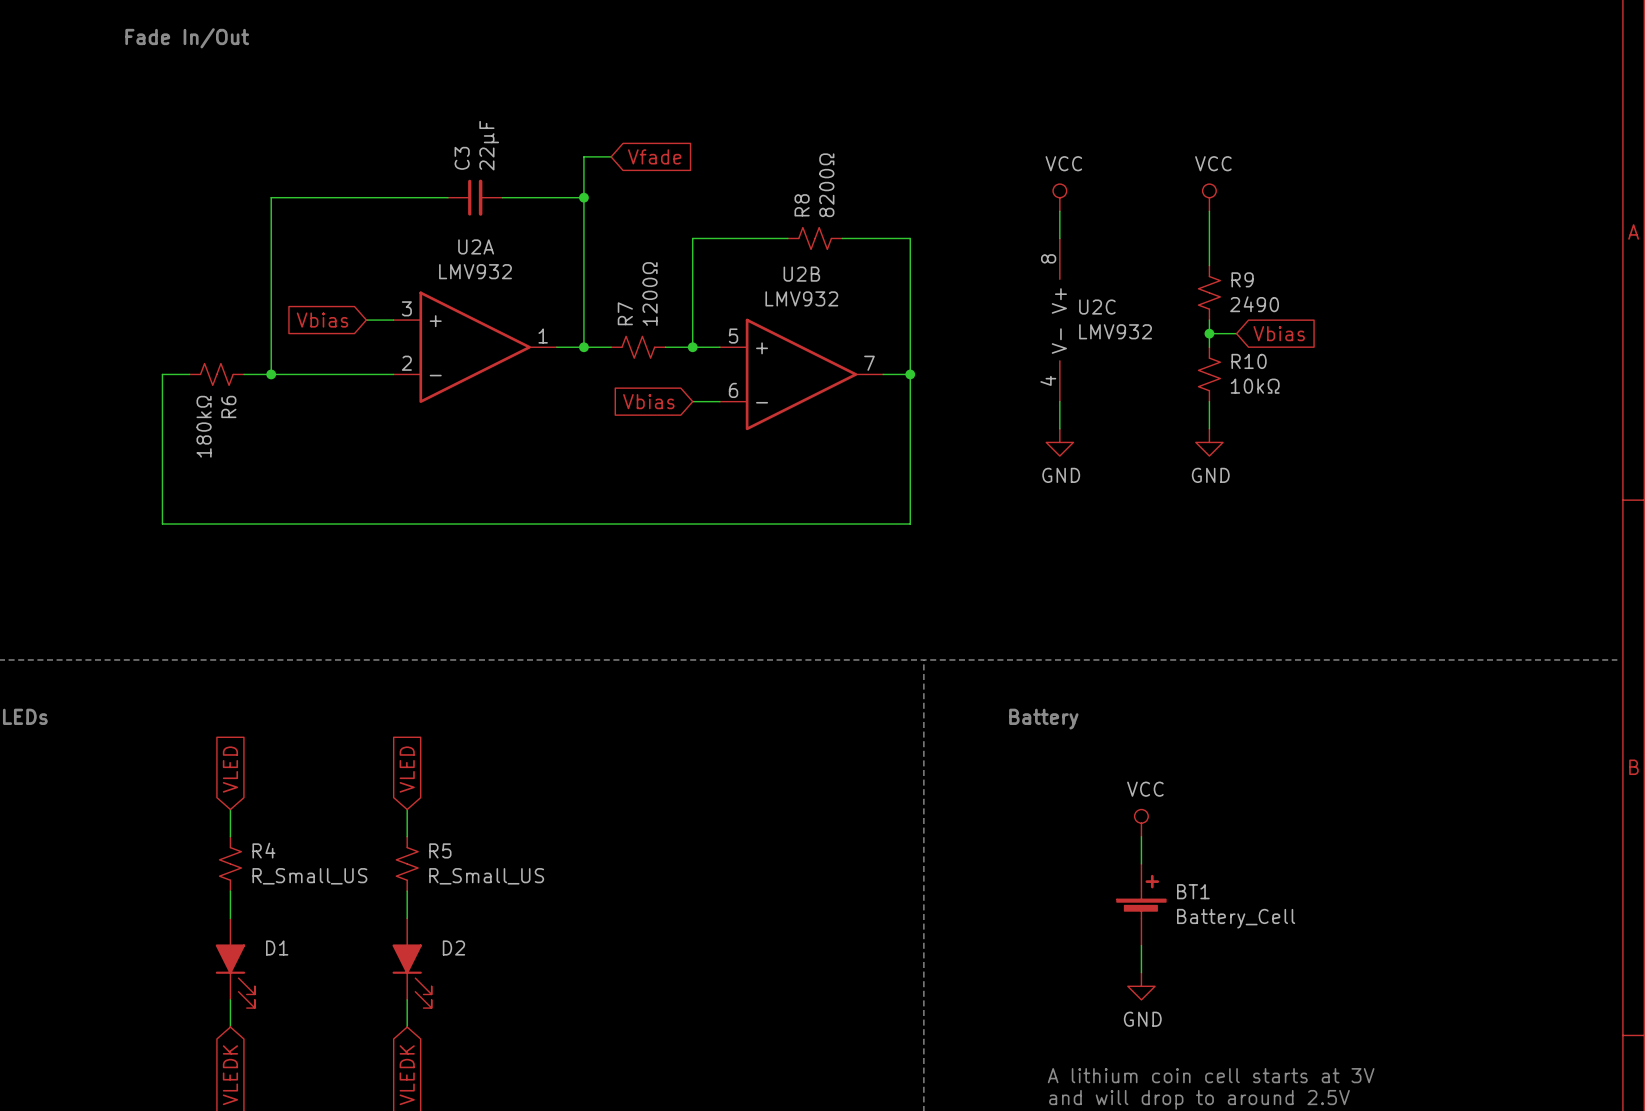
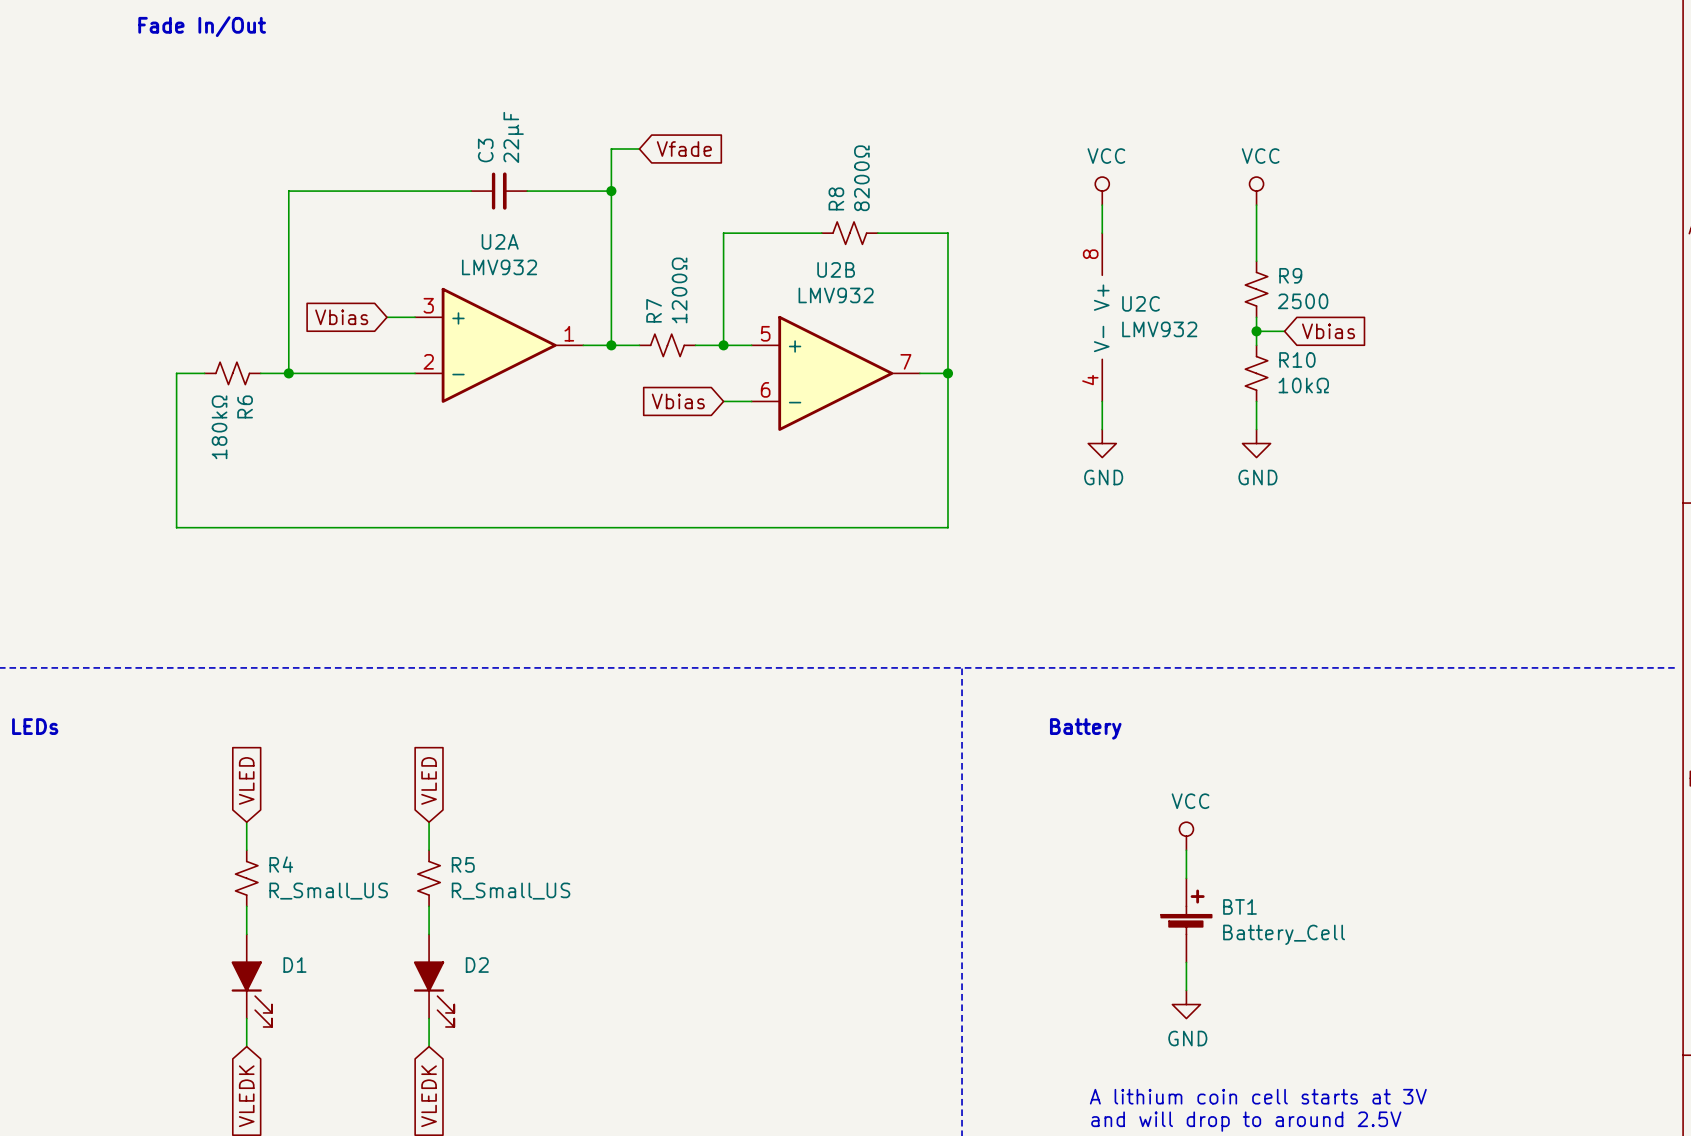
R9 value: 2490 (1254, 304) -> 2500 (1303, 301)

